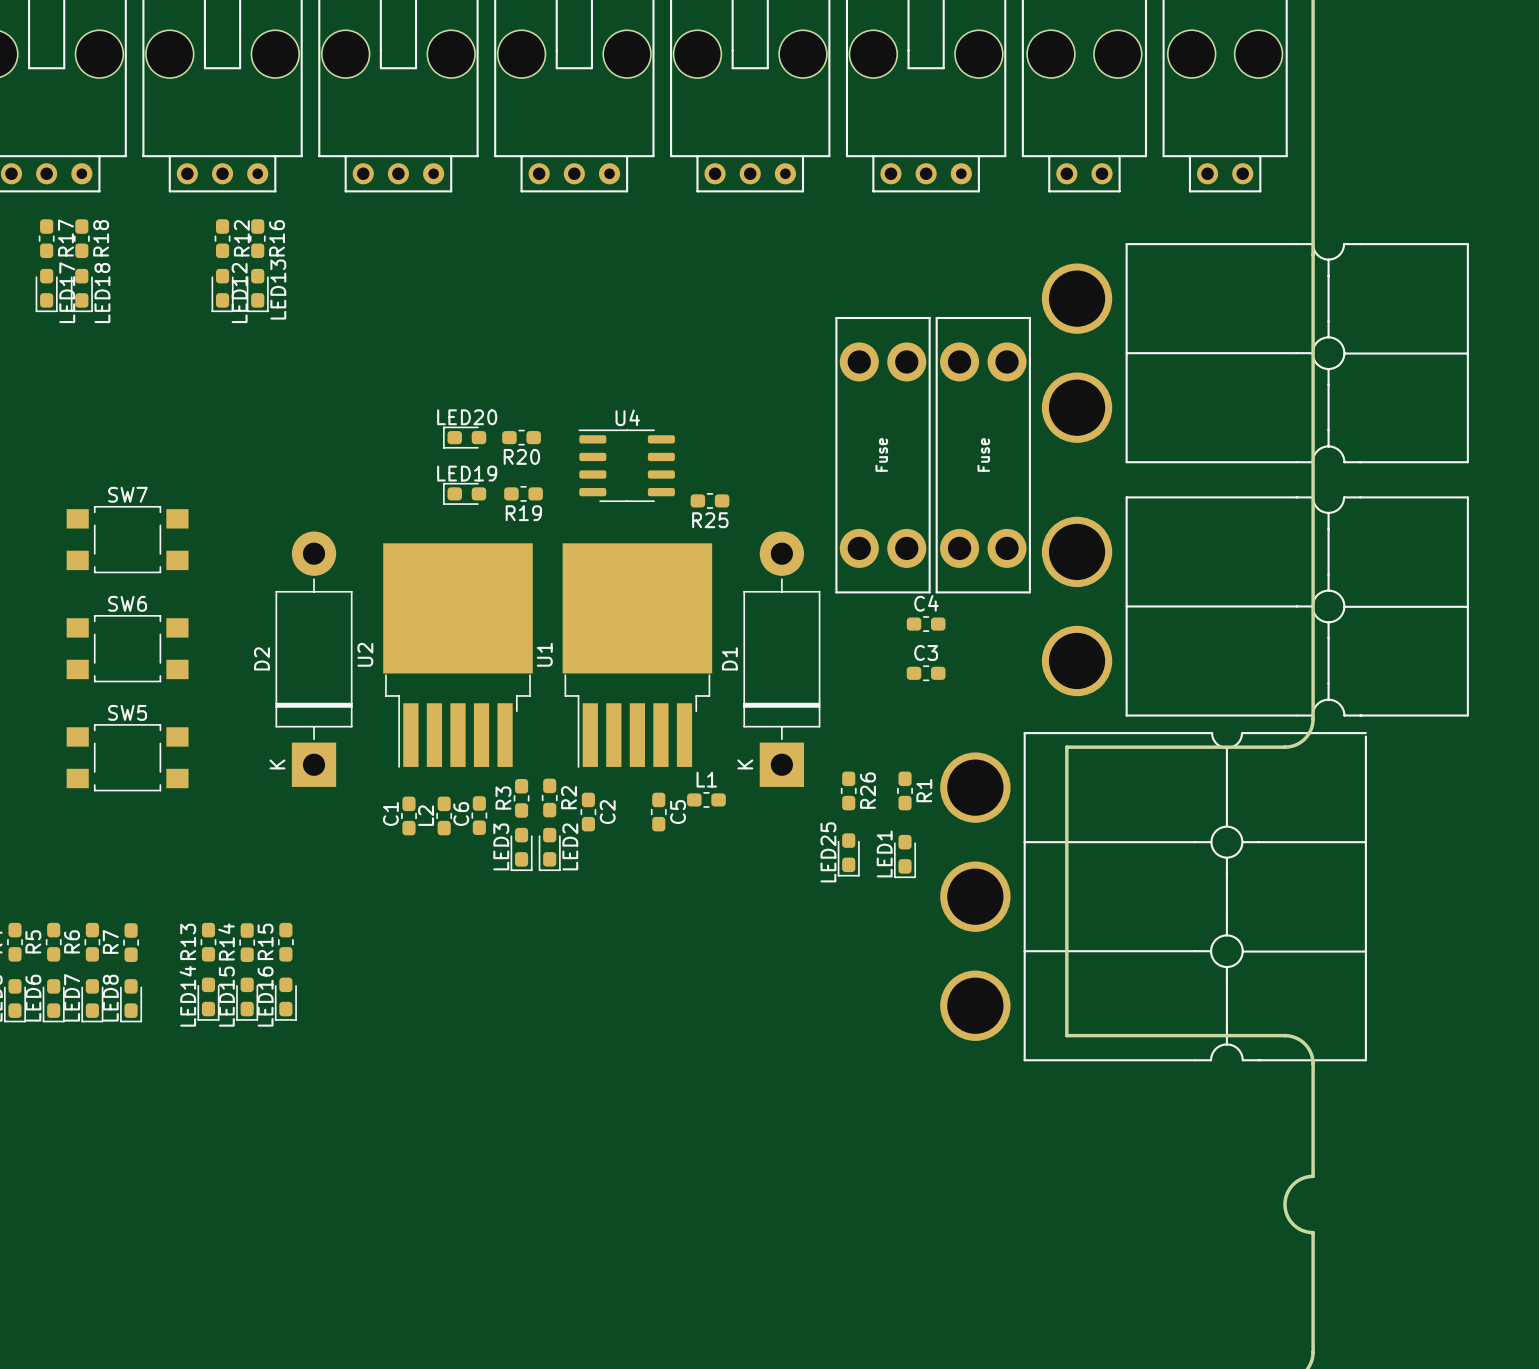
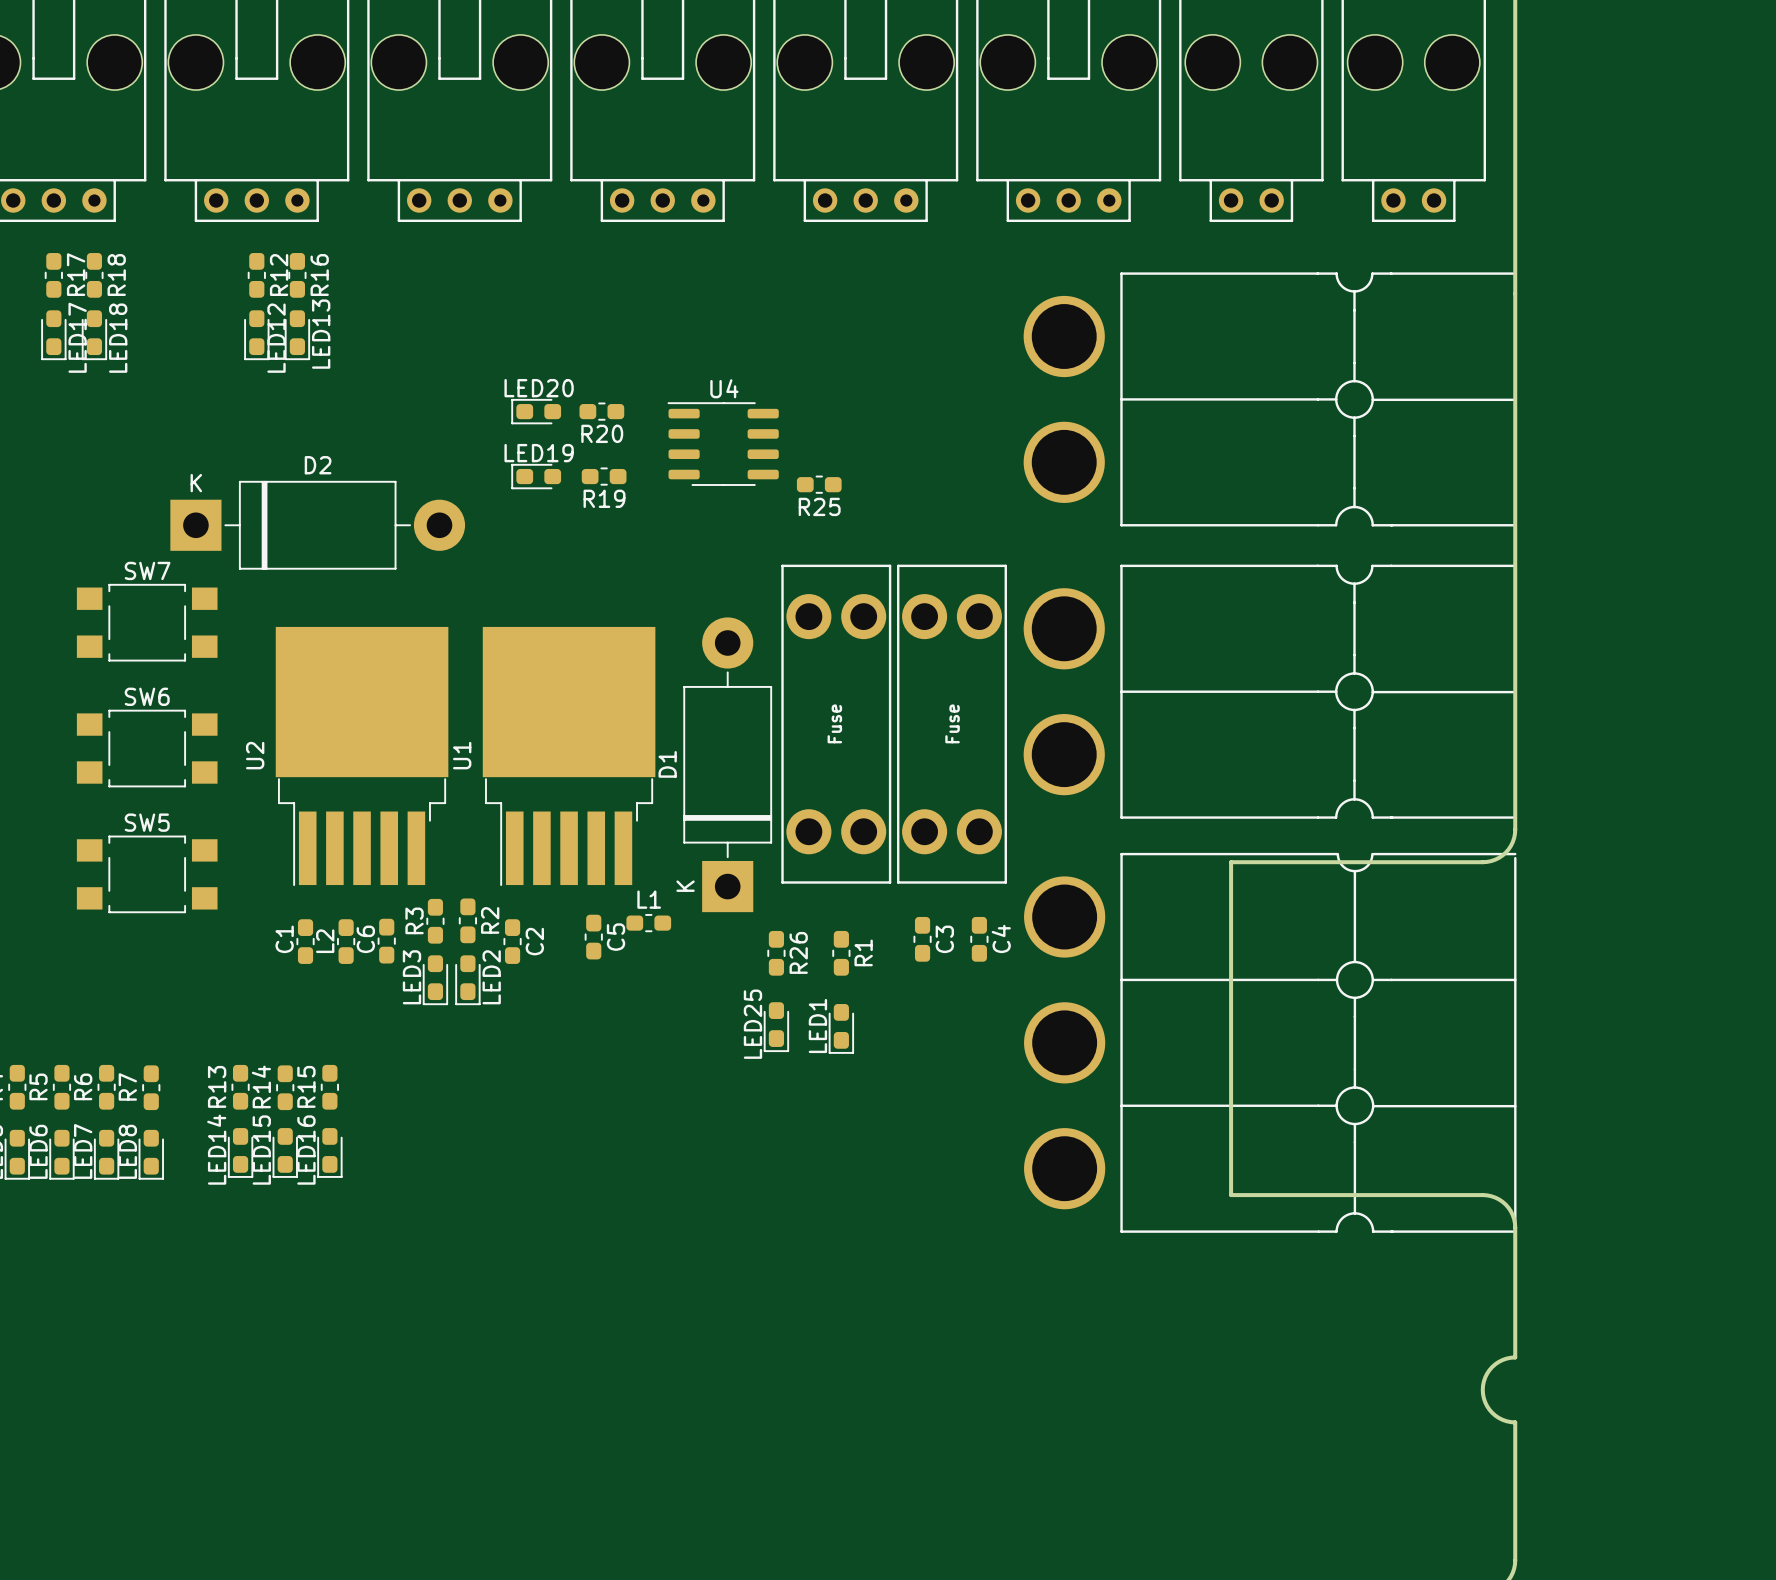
part: none -> (1270, 399)
part: (1255, 353) -> none
LED20 position: (464, 437) -> (536, 411)
R20 position: (521, 437) -> (601, 411)
part: Fuse (883, 455) -> none
part: Fuse (983, 455) -> none
U4 position: (626, 465) -> (723, 444)
LED19 position: (464, 493) -> (536, 476)
R19 position: (523, 493) -> (604, 476)
R25 position: (709, 500) -> (819, 484)
part: none -> (1270, 691)
part: (1255, 606) -> none
C4 rotation: 0° (926, 624) -> 90° clockwise (979, 939)
C4 position: (926, 624) -> (979, 939)
part: none -> Fuse (836, 724)
part: none -> Fuse (951, 724)
U2 position: (457, 655) -> (362, 756)
U1 position: (637, 655) -> (569, 756)
D2 rotation: 0° (314, 659) -> 90° clockwise (317, 525)
D2 position: (314, 659) -> (317, 525)
D1 position: (781, 659) -> (727, 764)
C3 rotation: 0° (926, 673) -> 90° clockwise (922, 939)
C3 position: (926, 673) -> (922, 939)
R26 position: (848, 790) -> (776, 953)
R1 position: (905, 790) -> (841, 953)
R2 position: (549, 797) -> (467, 920)
R3 position: (521, 798) -> (435, 921)
L1 position: (706, 799) -> (648, 923)
C2: (588, 812) -> none
C5 position: (658, 812) -> (593, 937)
L2: none -> (346, 941)
C1 position: (409, 815) -> (305, 941)
L2 name: L2 (426, 815) -> C2 (534, 941)
C6 position: (479, 815) -> (386, 941)
LED3 position: (521, 849) -> (435, 980)
LED2 position: (549, 849) -> (467, 980)
LED25 position: (848, 854) -> (776, 1027)
LED1 position: (905, 856) -> (841, 1028)
part position: (1153, 896) -> (1270, 1042)

